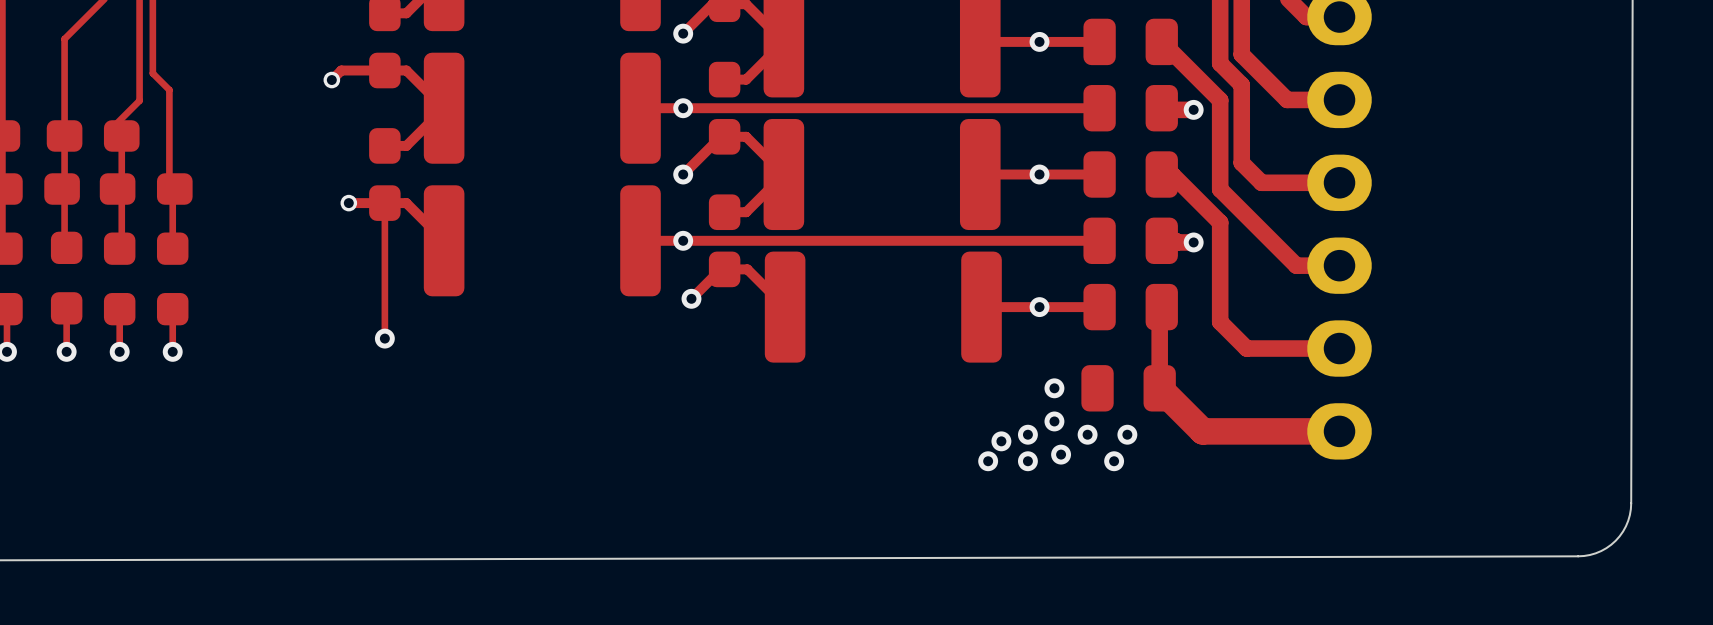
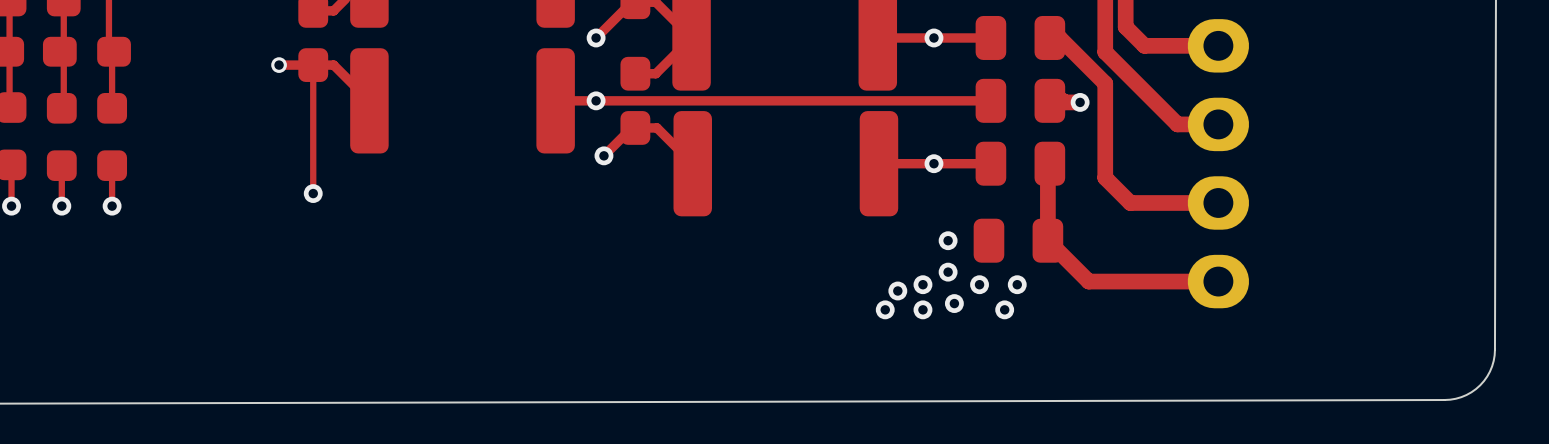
top track width: thick (1159, 388) (1202, 431) (1318, 431) -> thin (1047, 240) (1088, 281) (1198, 281)

